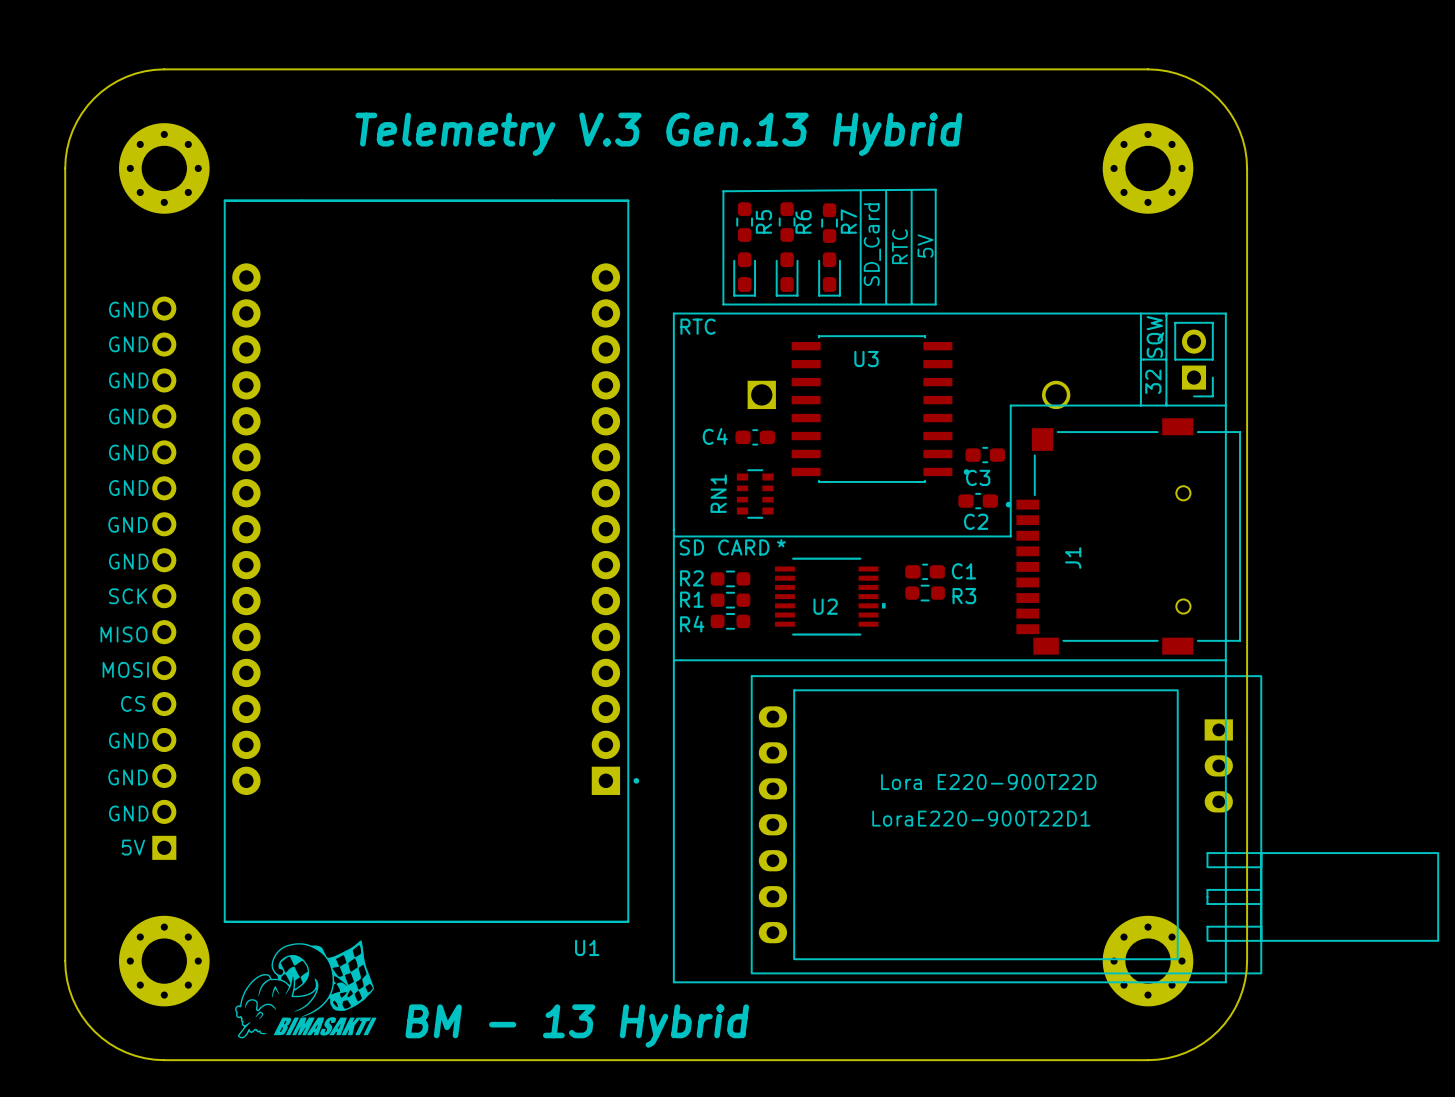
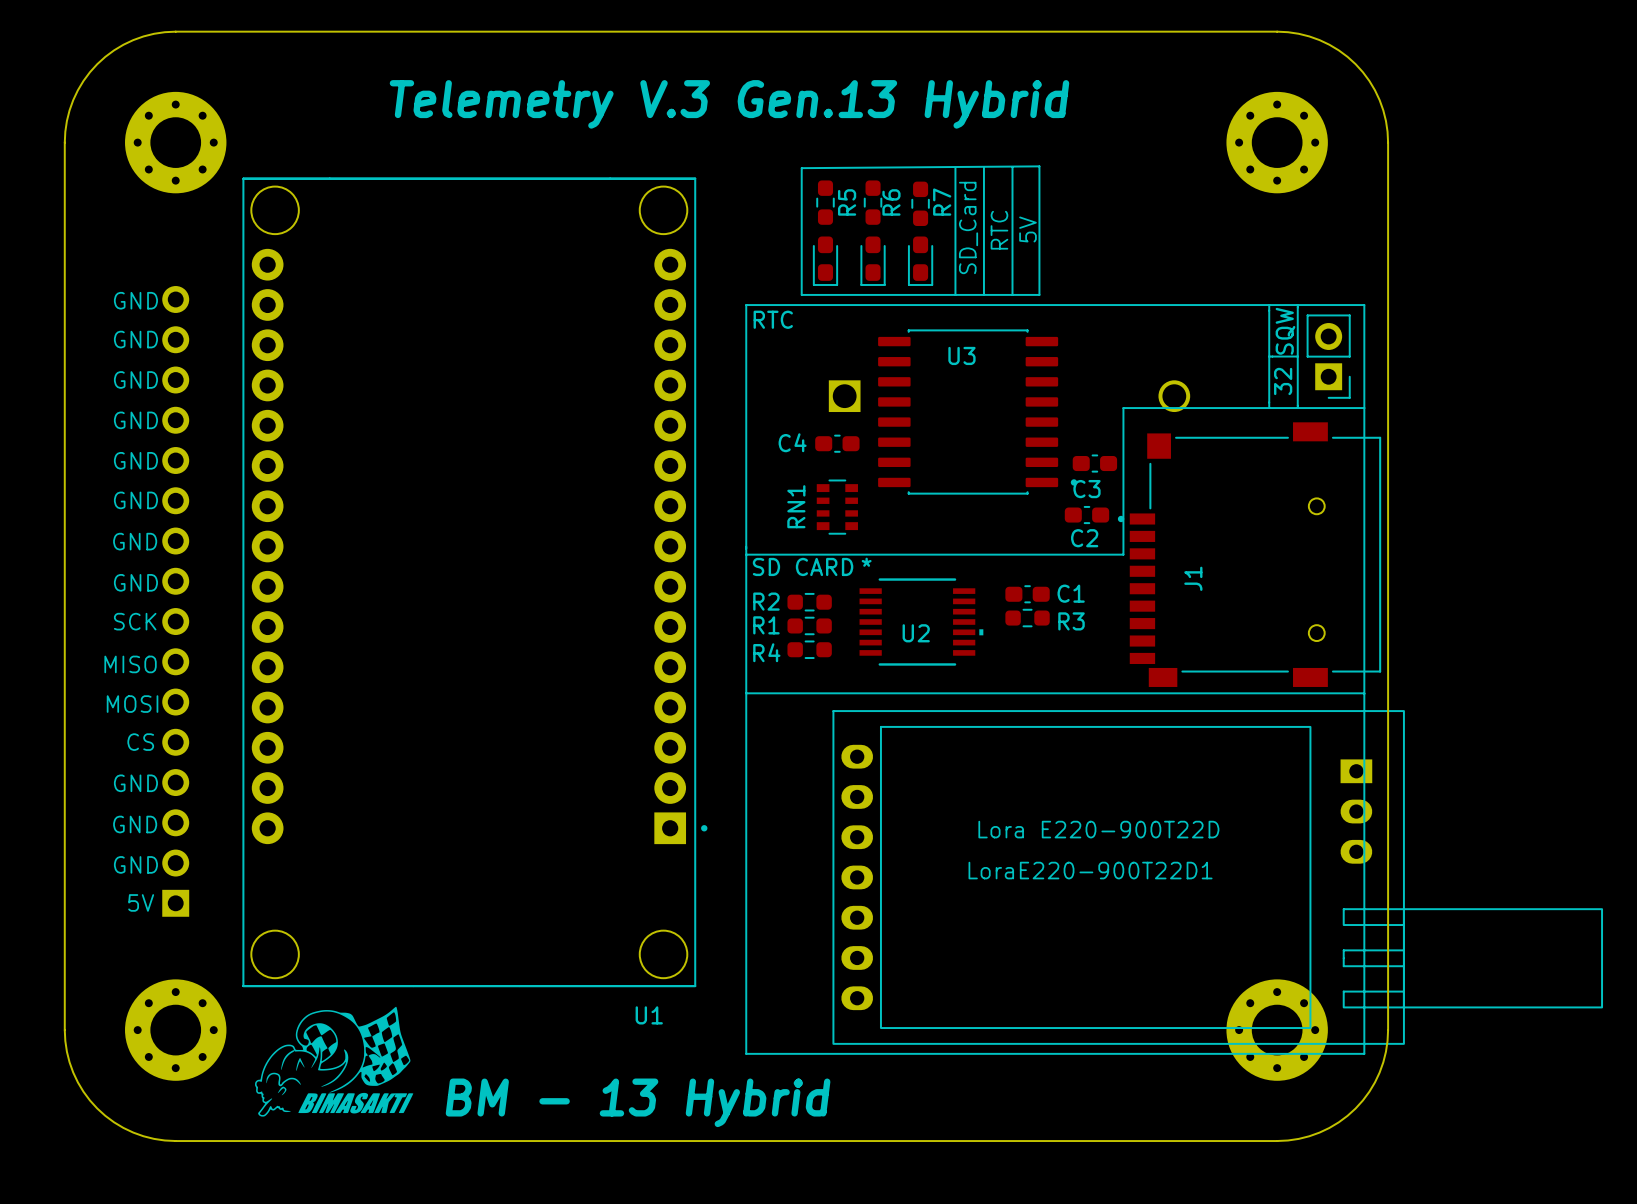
U1 footprint: [223, 199, 640, 923] -> [242, 177, 708, 988]

